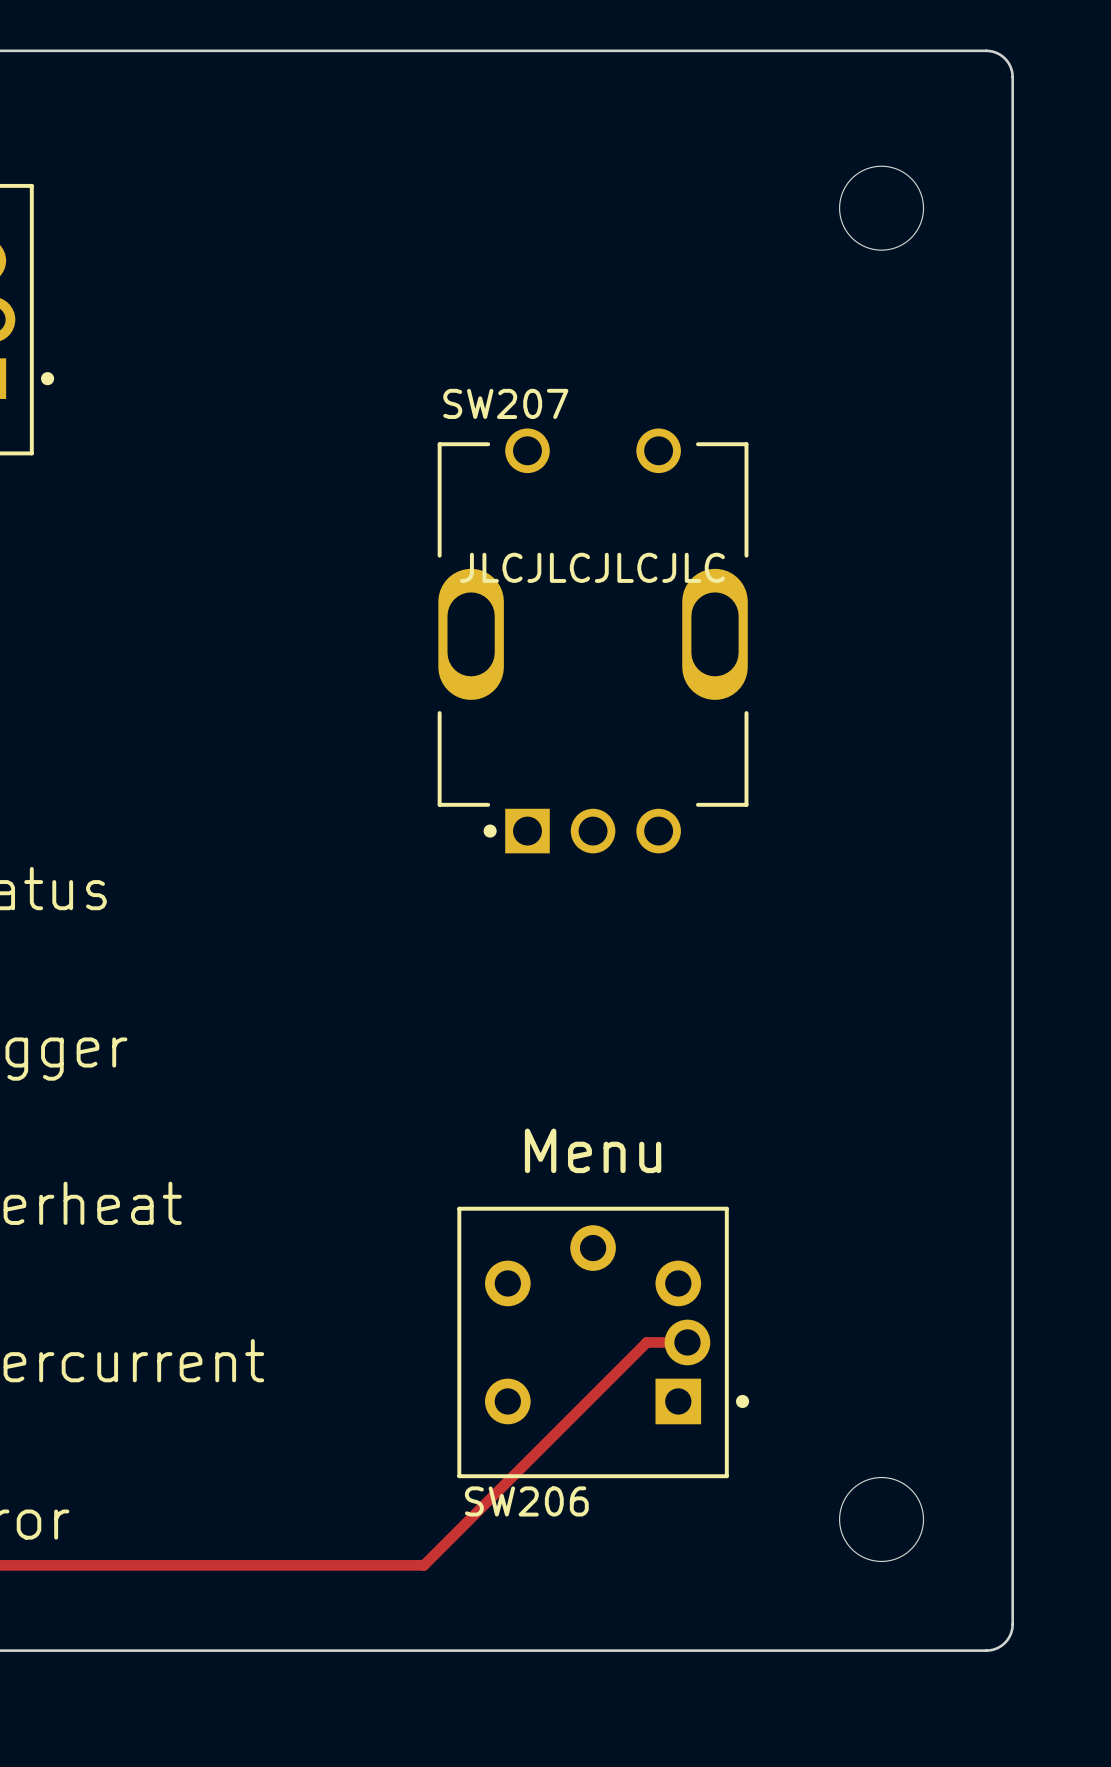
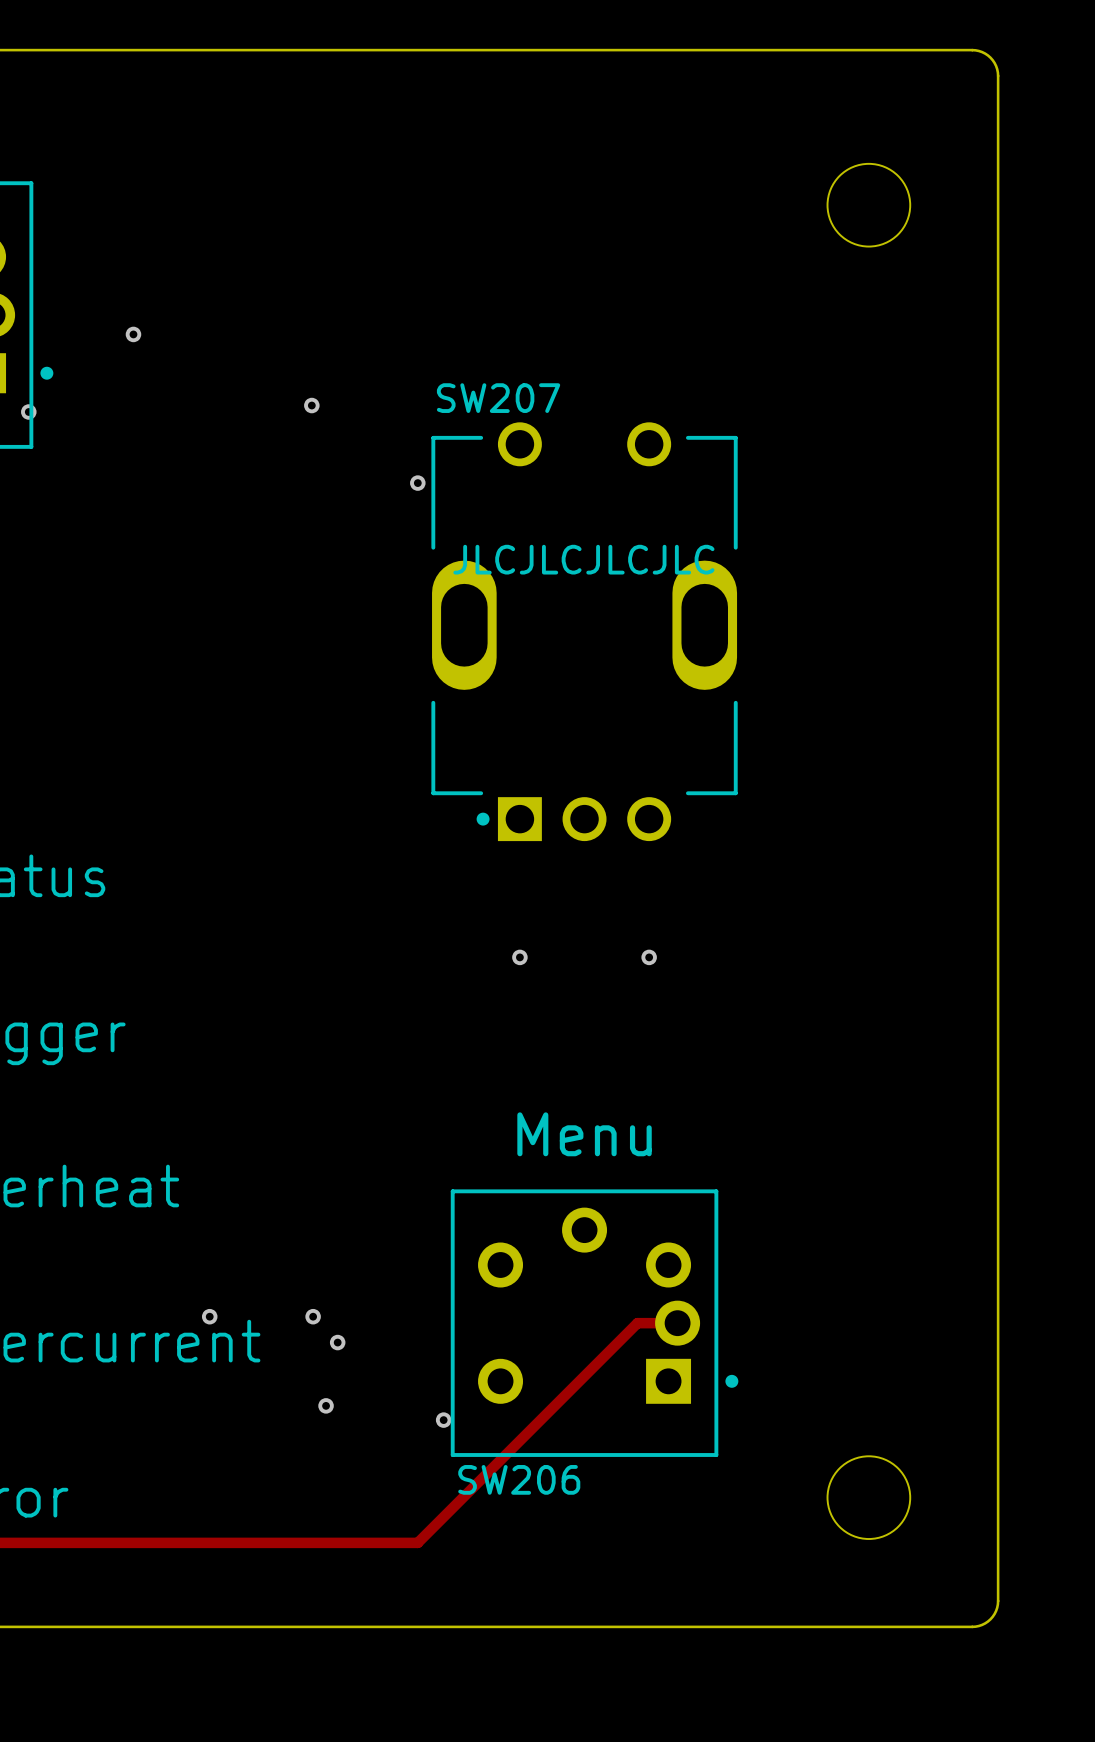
via: none -> (133, 334)
via: none -> (311, 405)
via: none -> (28, 411)
via: none -> (417, 483)
via: none -> (519, 957)
via: none -> (649, 957)
via: none -> (209, 1316)
via: none -> (313, 1316)
via: none -> (337, 1342)
via: none -> (326, 1405)
via: none -> (443, 1420)

